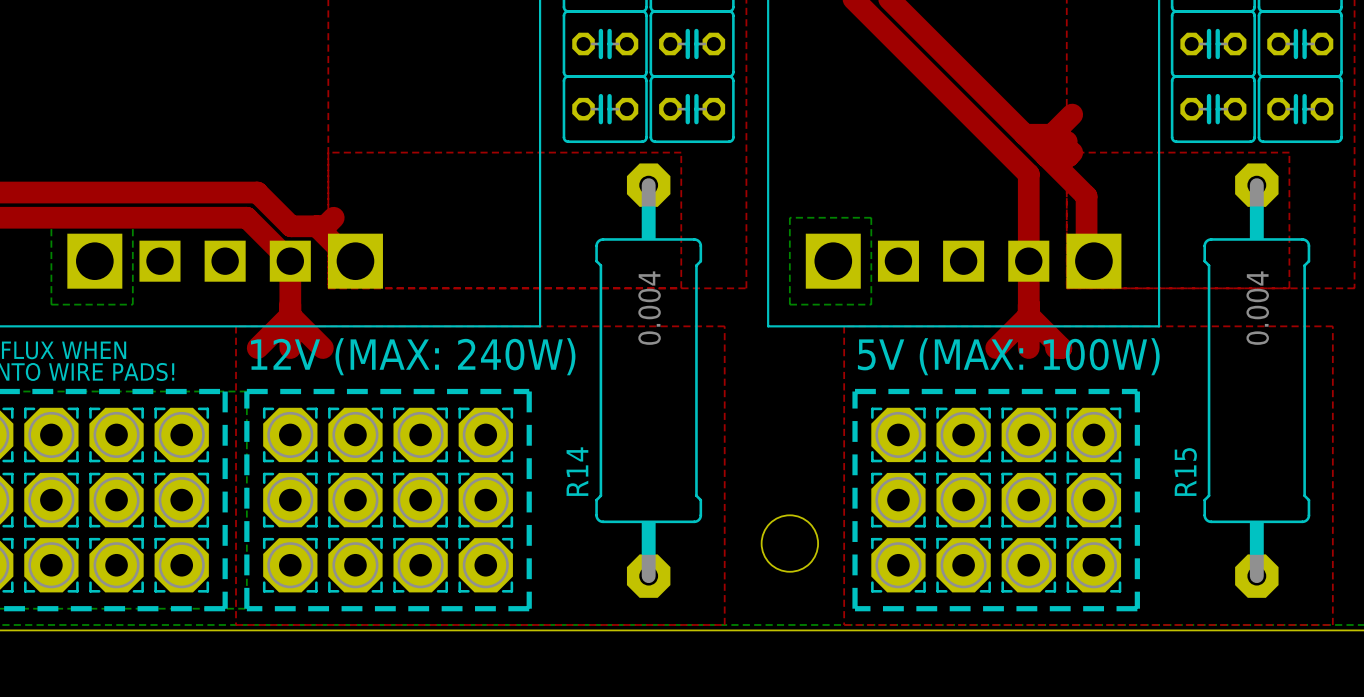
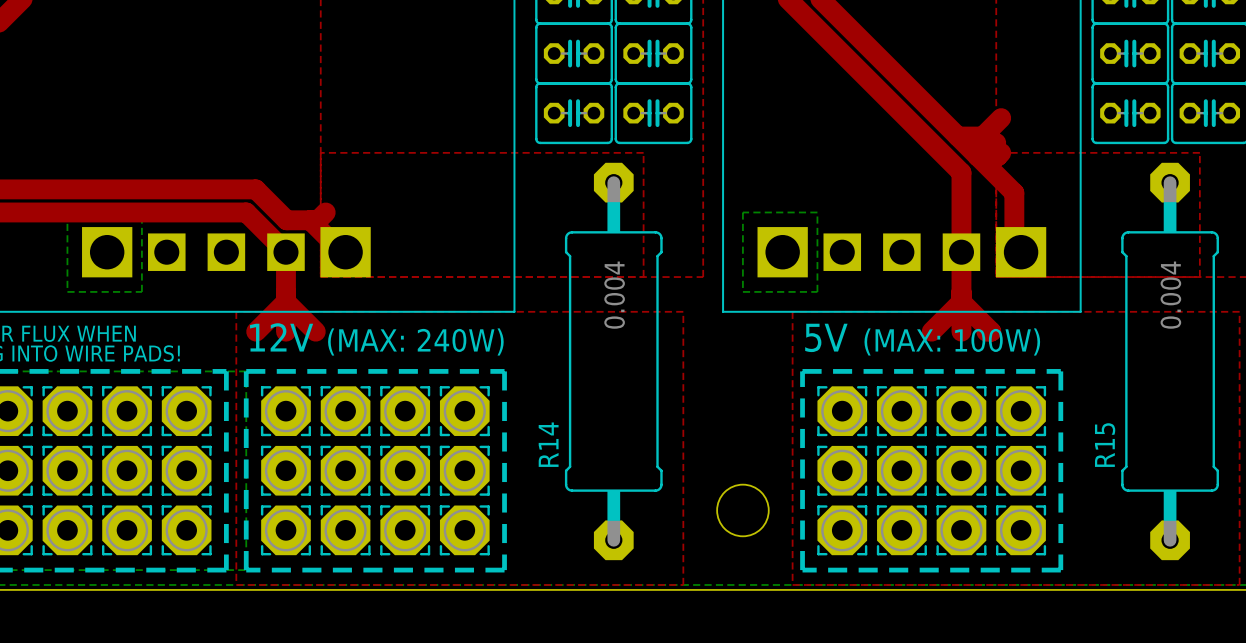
text: 12V (MAX: 240W) (413, 356) -> 12V (281, 337)
text: 5V (MAX: 100W) (1008, 356) -> 5V (826, 337)
text: none -> (MAX: 240W) (415, 341)
text: none -> (MAX: 100W) (952, 341)

